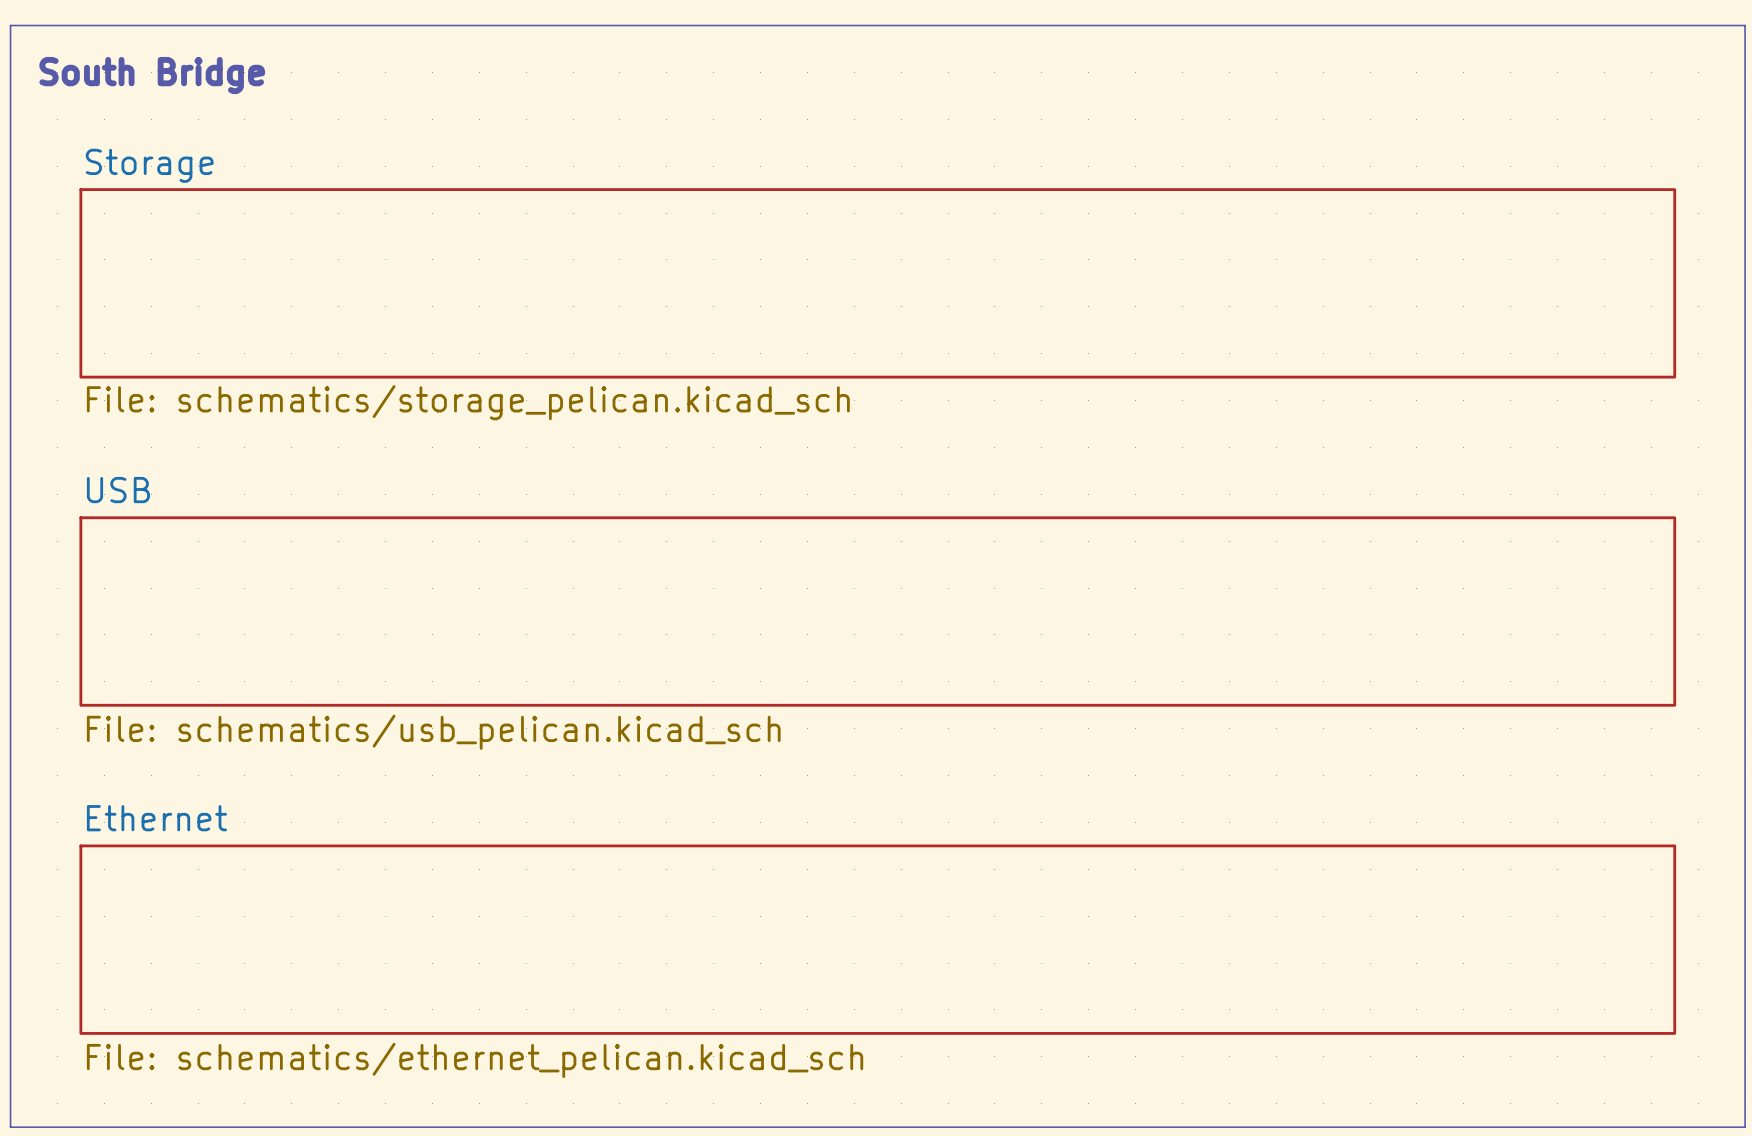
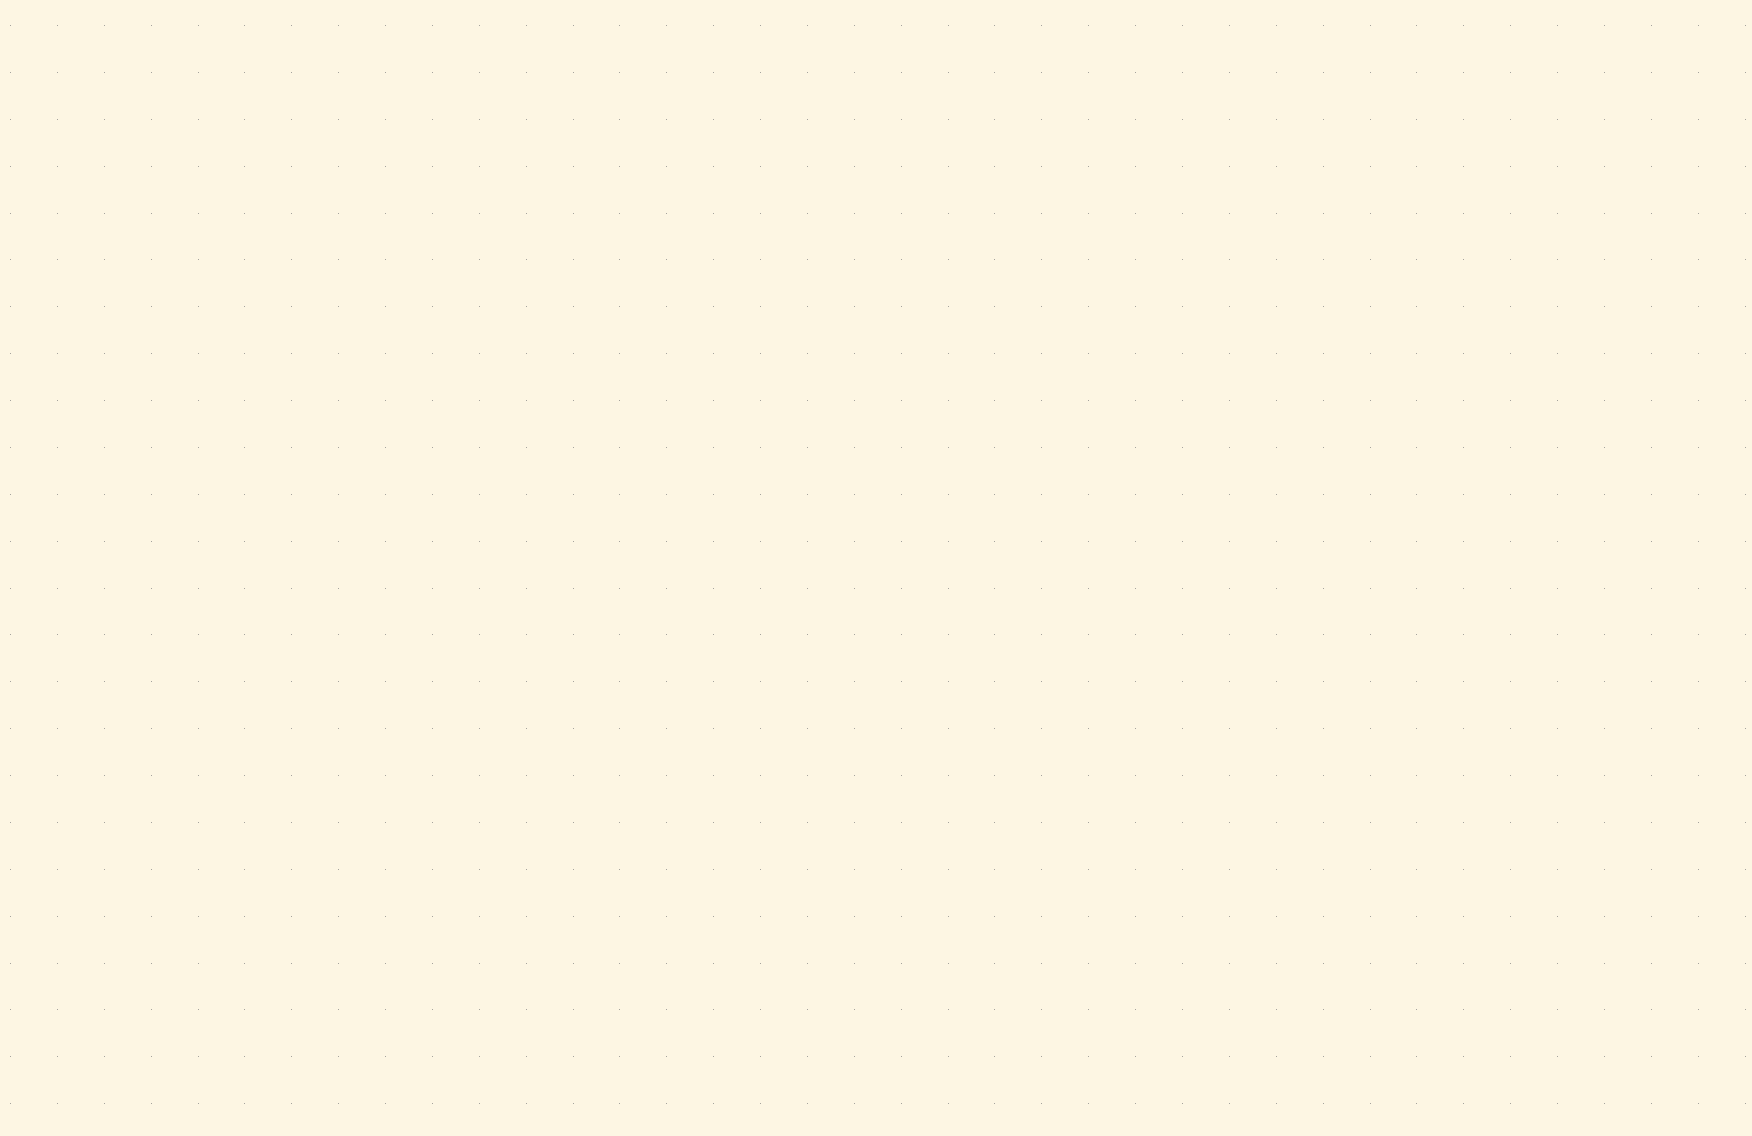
line: (10, 25) (1745, 25) (1745, 1127) (10, 1127) (10, 25) -> none
text: South Bridge (152, 75) -> none
sheet Storage: File: schematics/storage_pelican.kicad_sch (877, 283) -> none
sheet USB: File: schematics/usb_pelican.kicad_sch (877, 611) -> none
sheet Ethernet: File: schematics/ethernet_pelican.kicad_sch (877, 939) -> none

